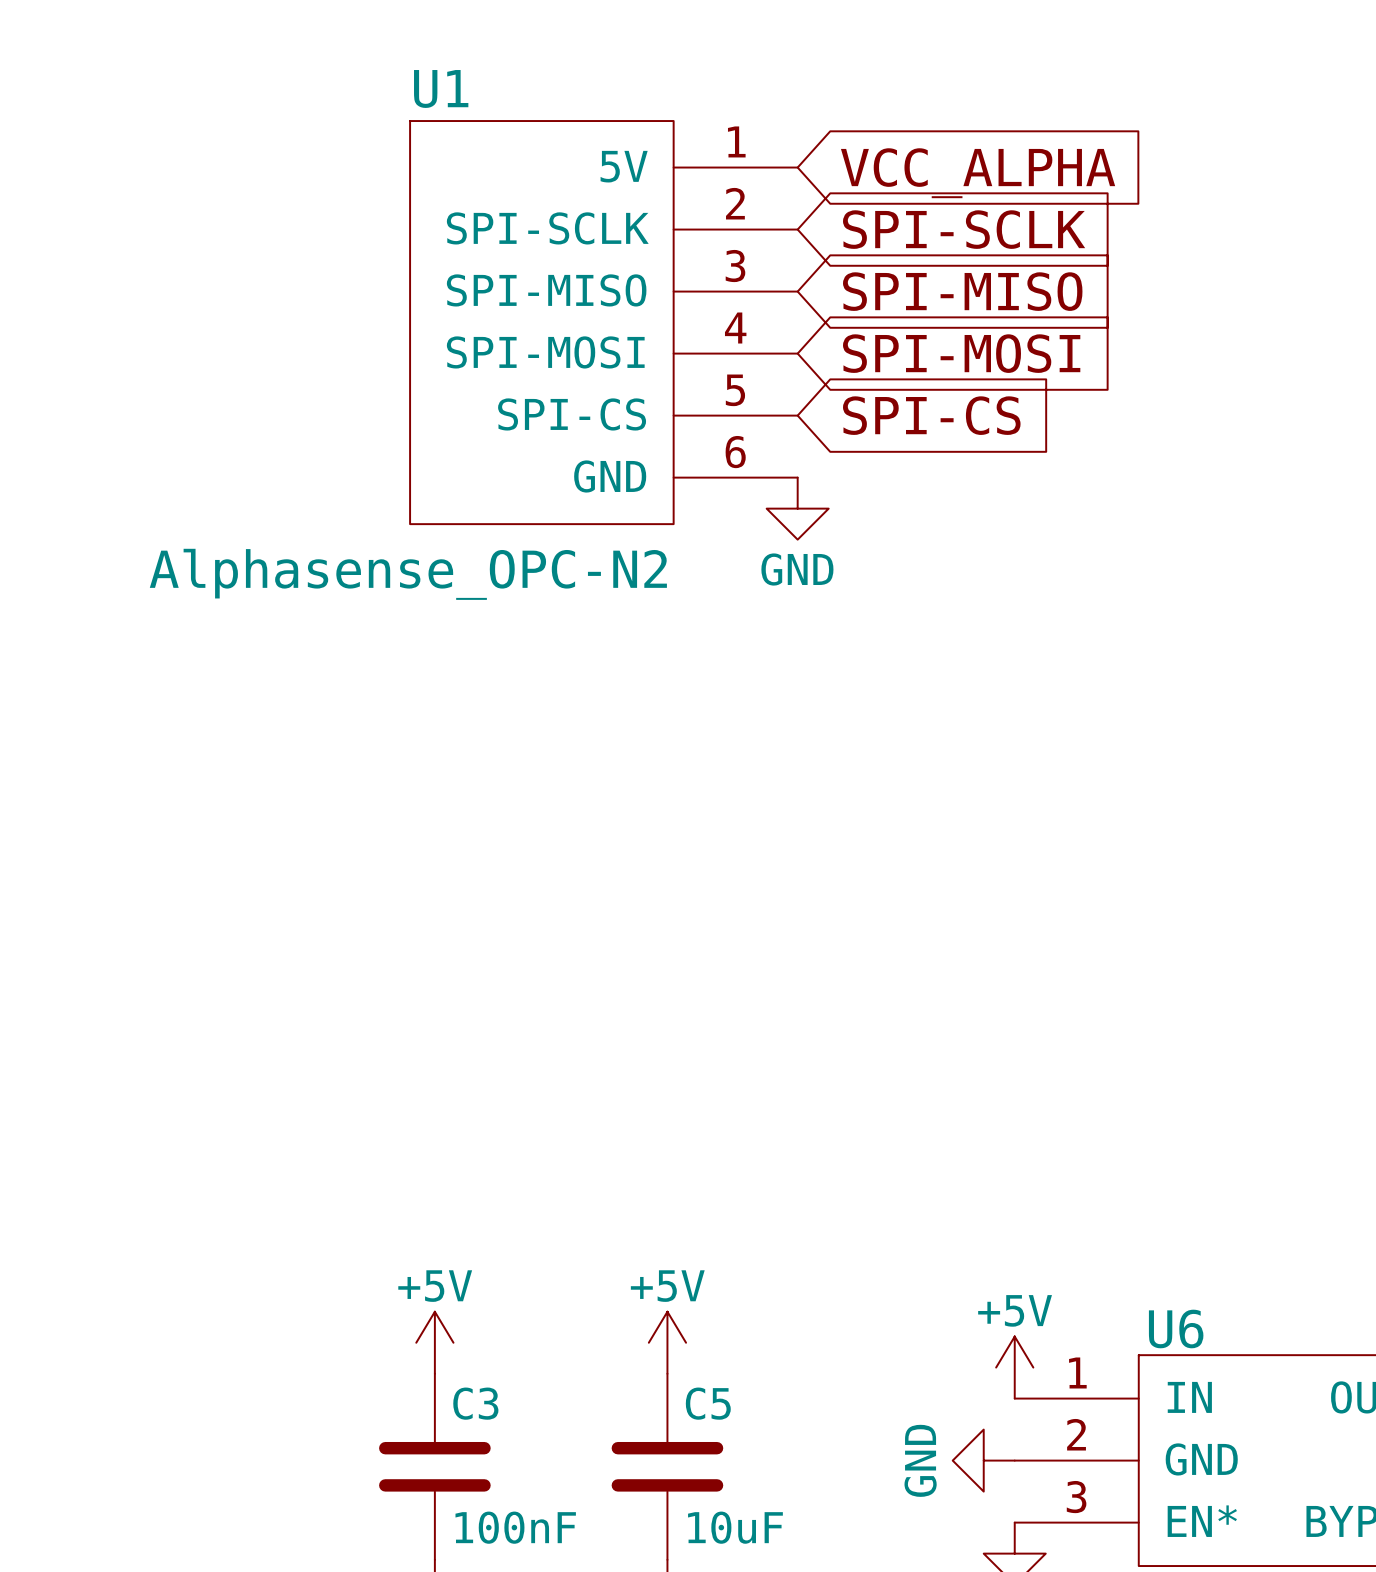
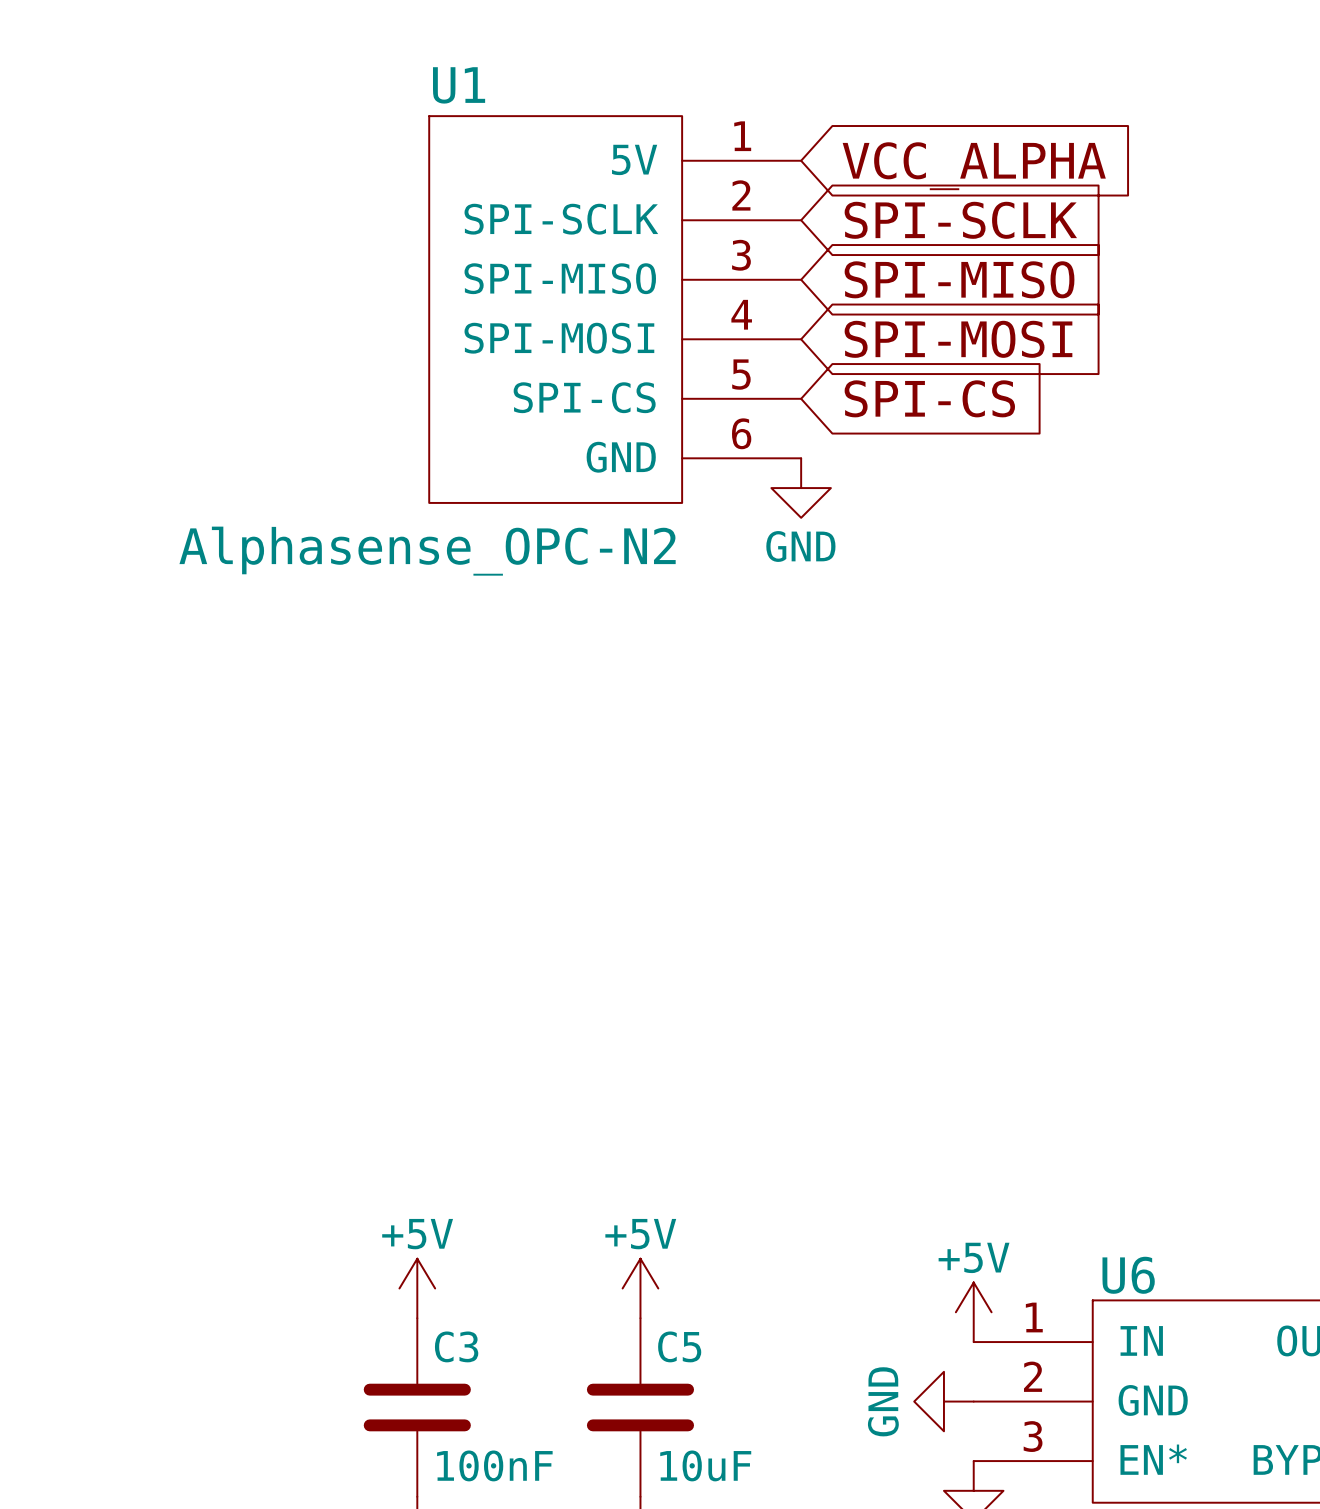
global label position: VCC_ALPHA (978, 173) -> VCC_ALPHA (974, 166)
global label position: SPI-SCLK (964, 229) -> SPI-SCLK (960, 220)
global label position: SPI-MISO (962, 291) -> SPI-MISO (959, 279)
U1 position: (603, 322) -> (615, 309)
global label position: SPI-MOSI (961, 353) -> SPI-MOSI (958, 339)
global label position: SPI-CS (931, 415) -> SPI-CS (929, 398)
power symbol position: GND (797, 508) -> GND (801, 488)

